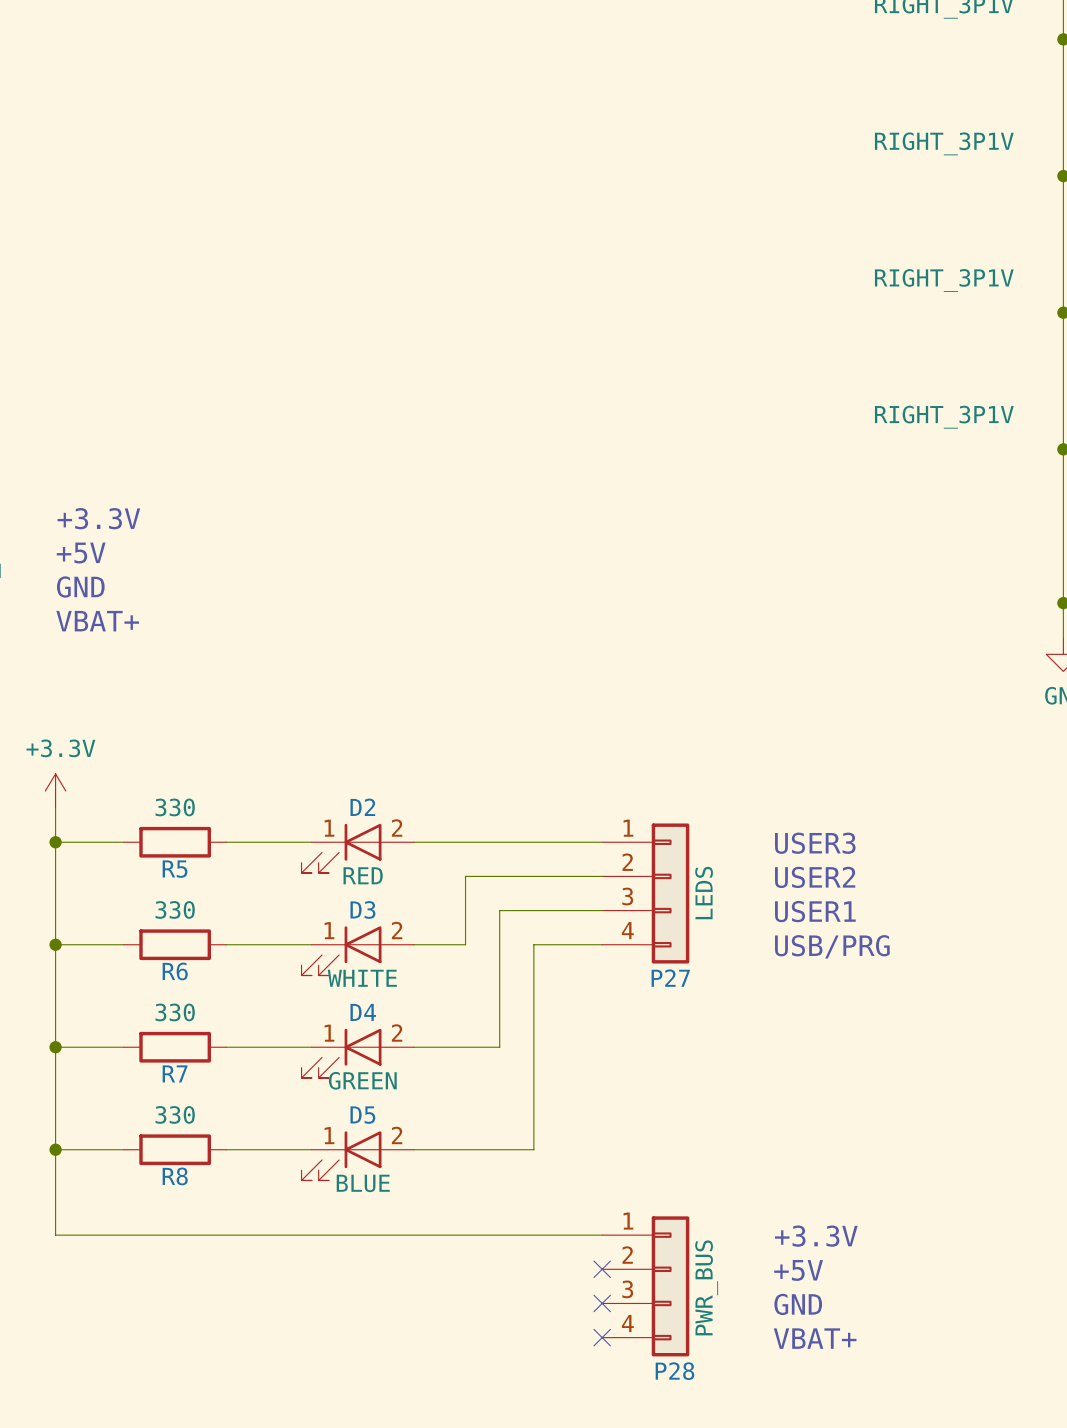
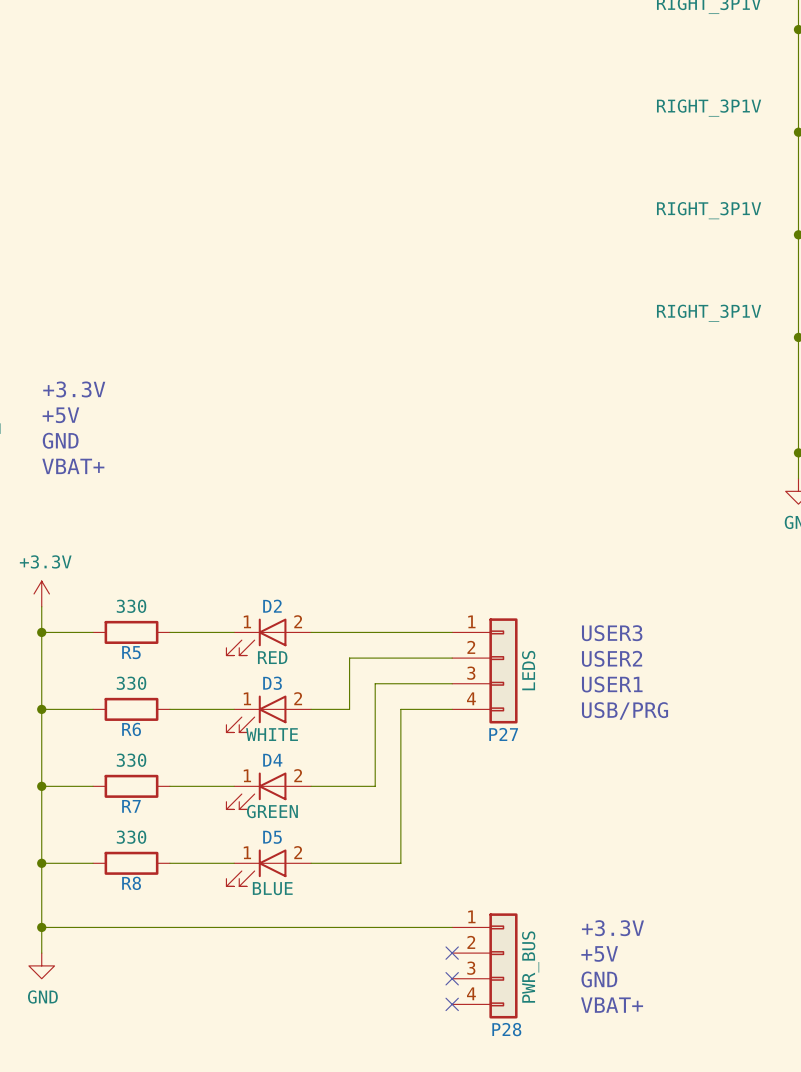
wire: none -> (41, 927) (41, 953)
junction: none -> (41, 927)
power symbol: none -> GND (41, 965)

